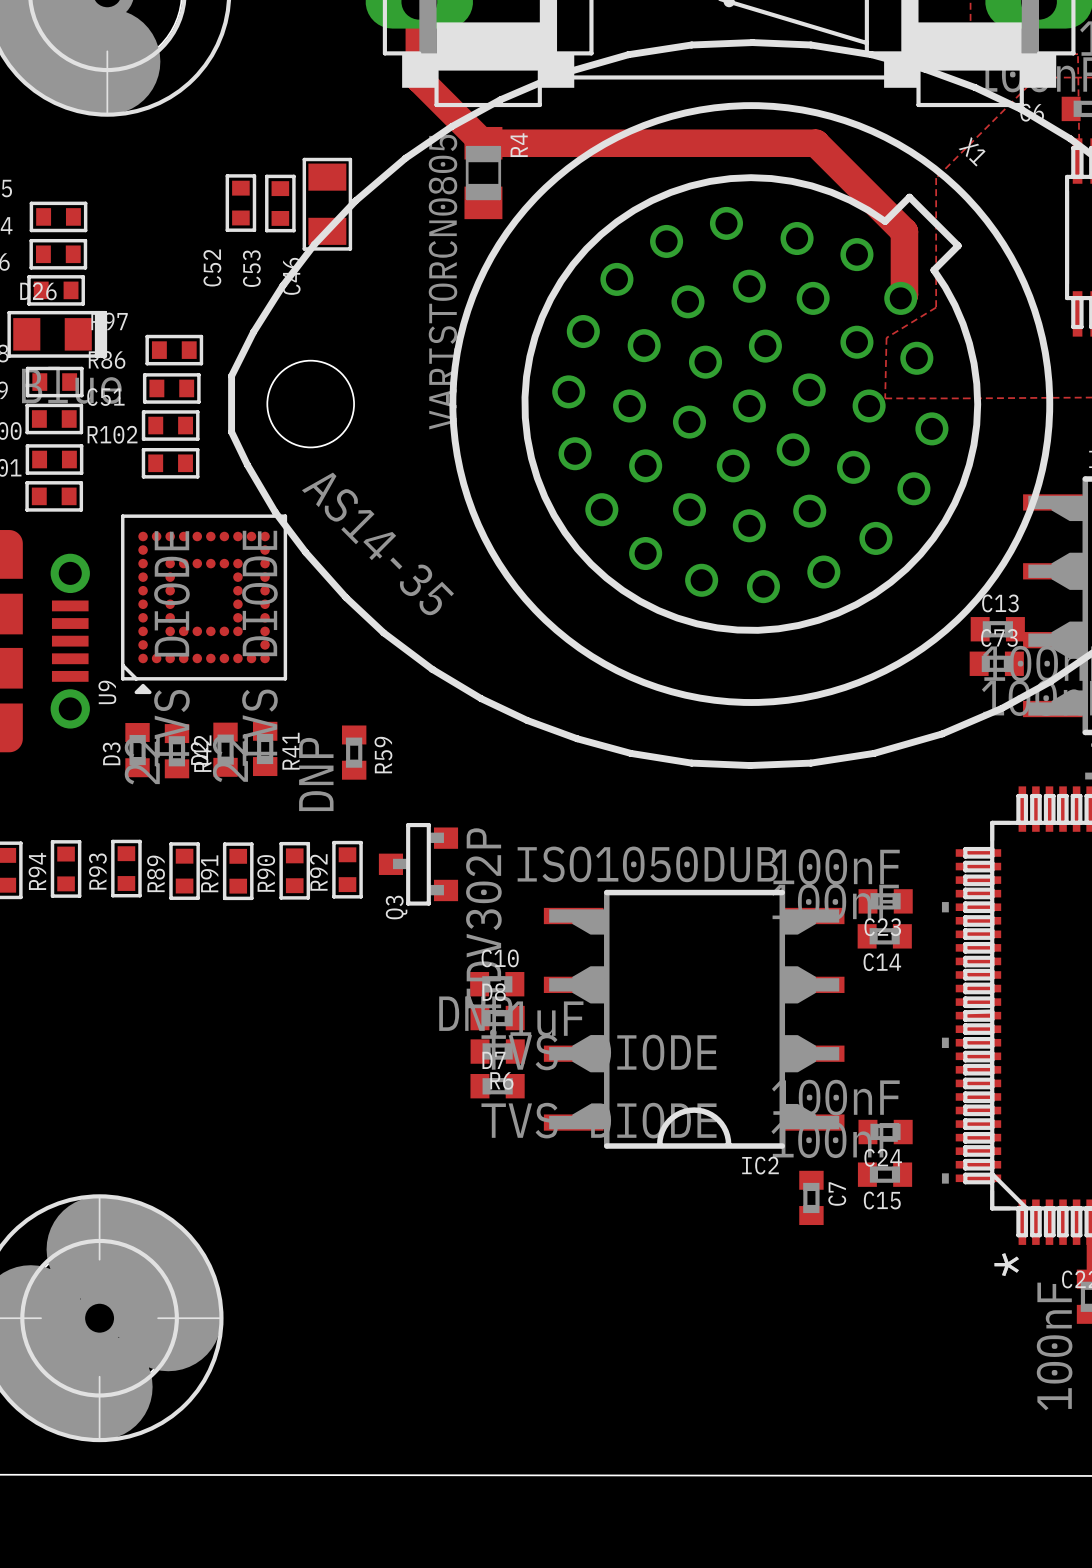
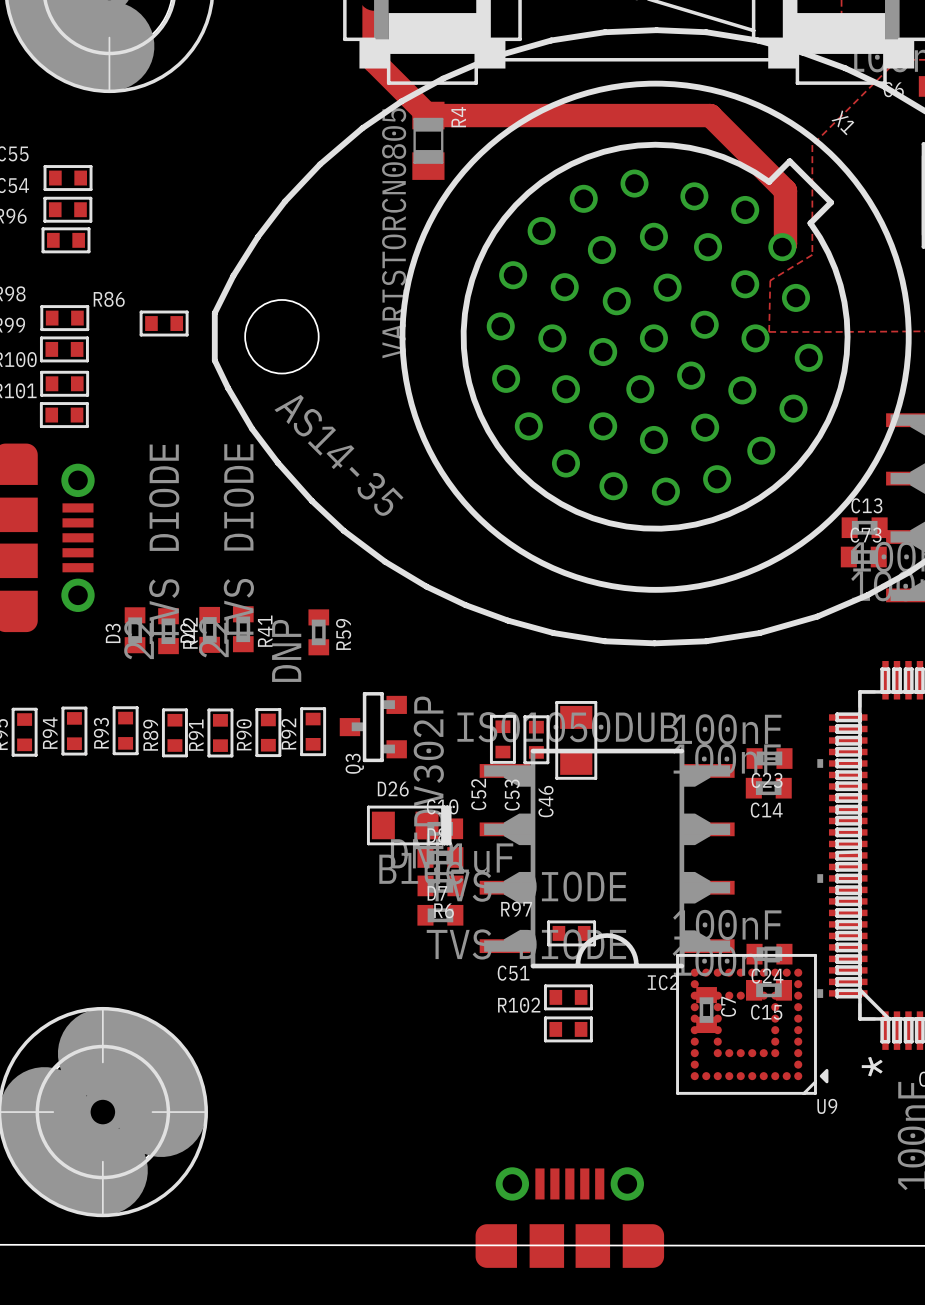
C52 position: (240, 203) -> (502, 739)
C53 position: (280, 203) -> (536, 739)
C46 position: (327, 204) -> (576, 740)
D26 position: (57, 334) -> (409, 825)
R97 position: (174, 350) -> (571, 933)
C51 position: (170, 425) -> (568, 997)
R102 position: (170, 463) -> (568, 1029)
U9 rotation: 0° (204, 604) -> 90° counterclockwise (752, 1024)
U9 position: (204, 604) -> (752, 1024)
part: none -> (569, 1217)

